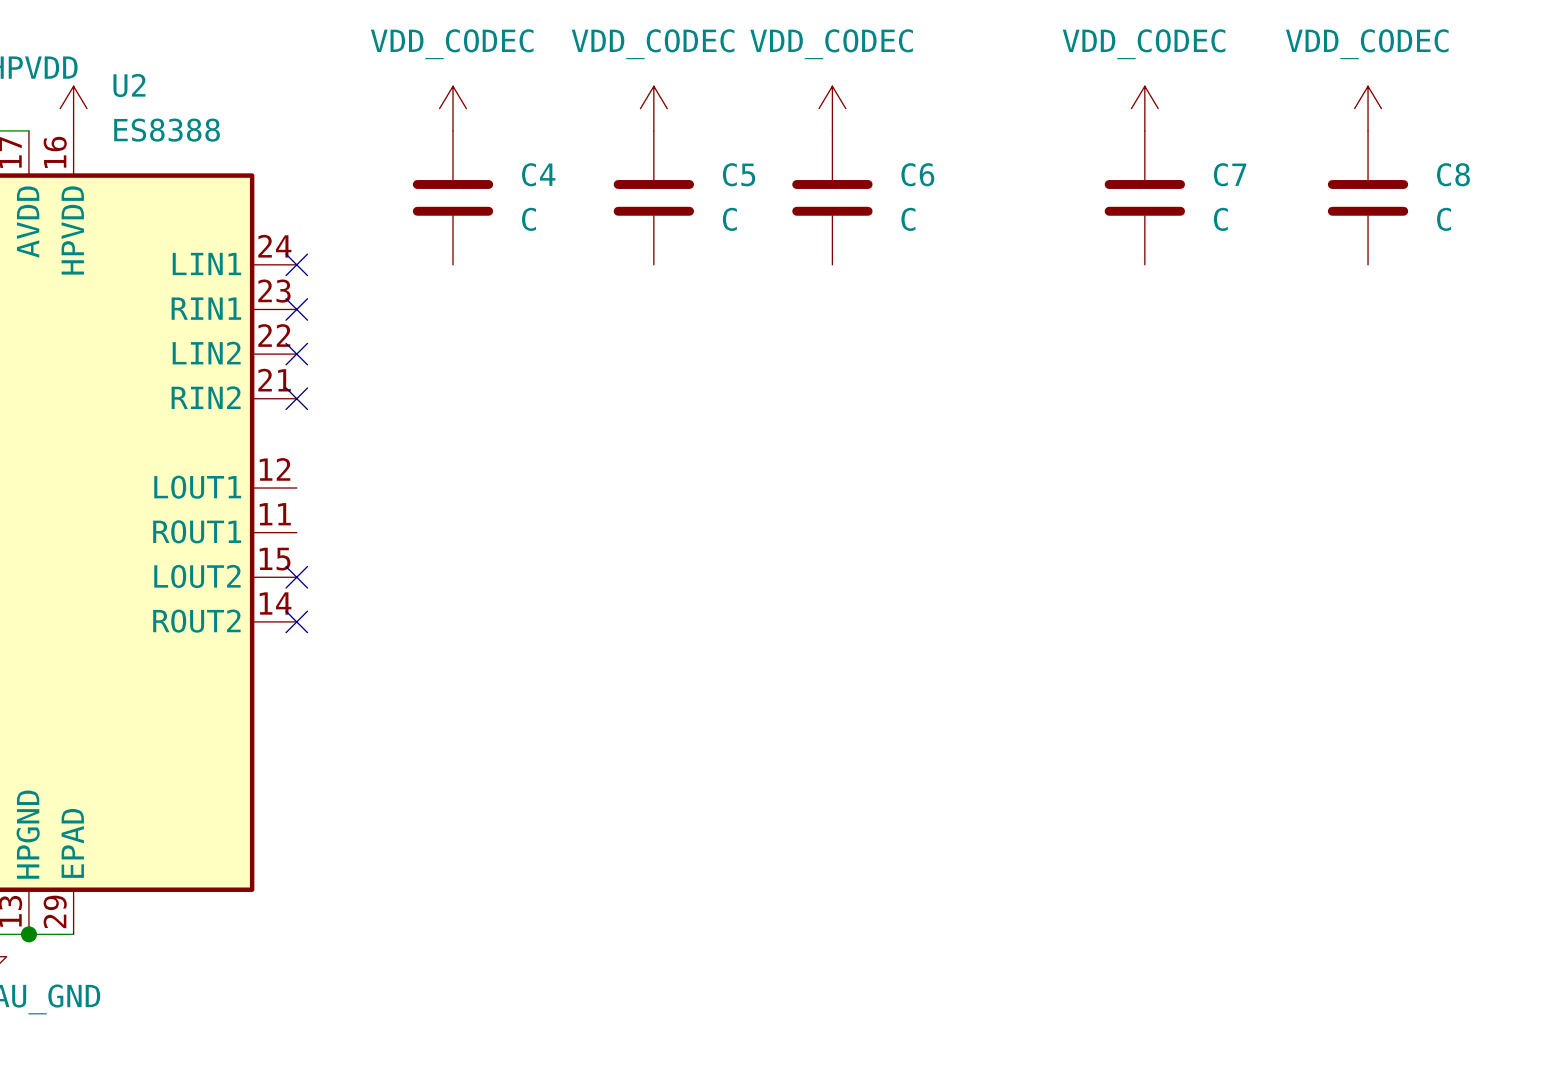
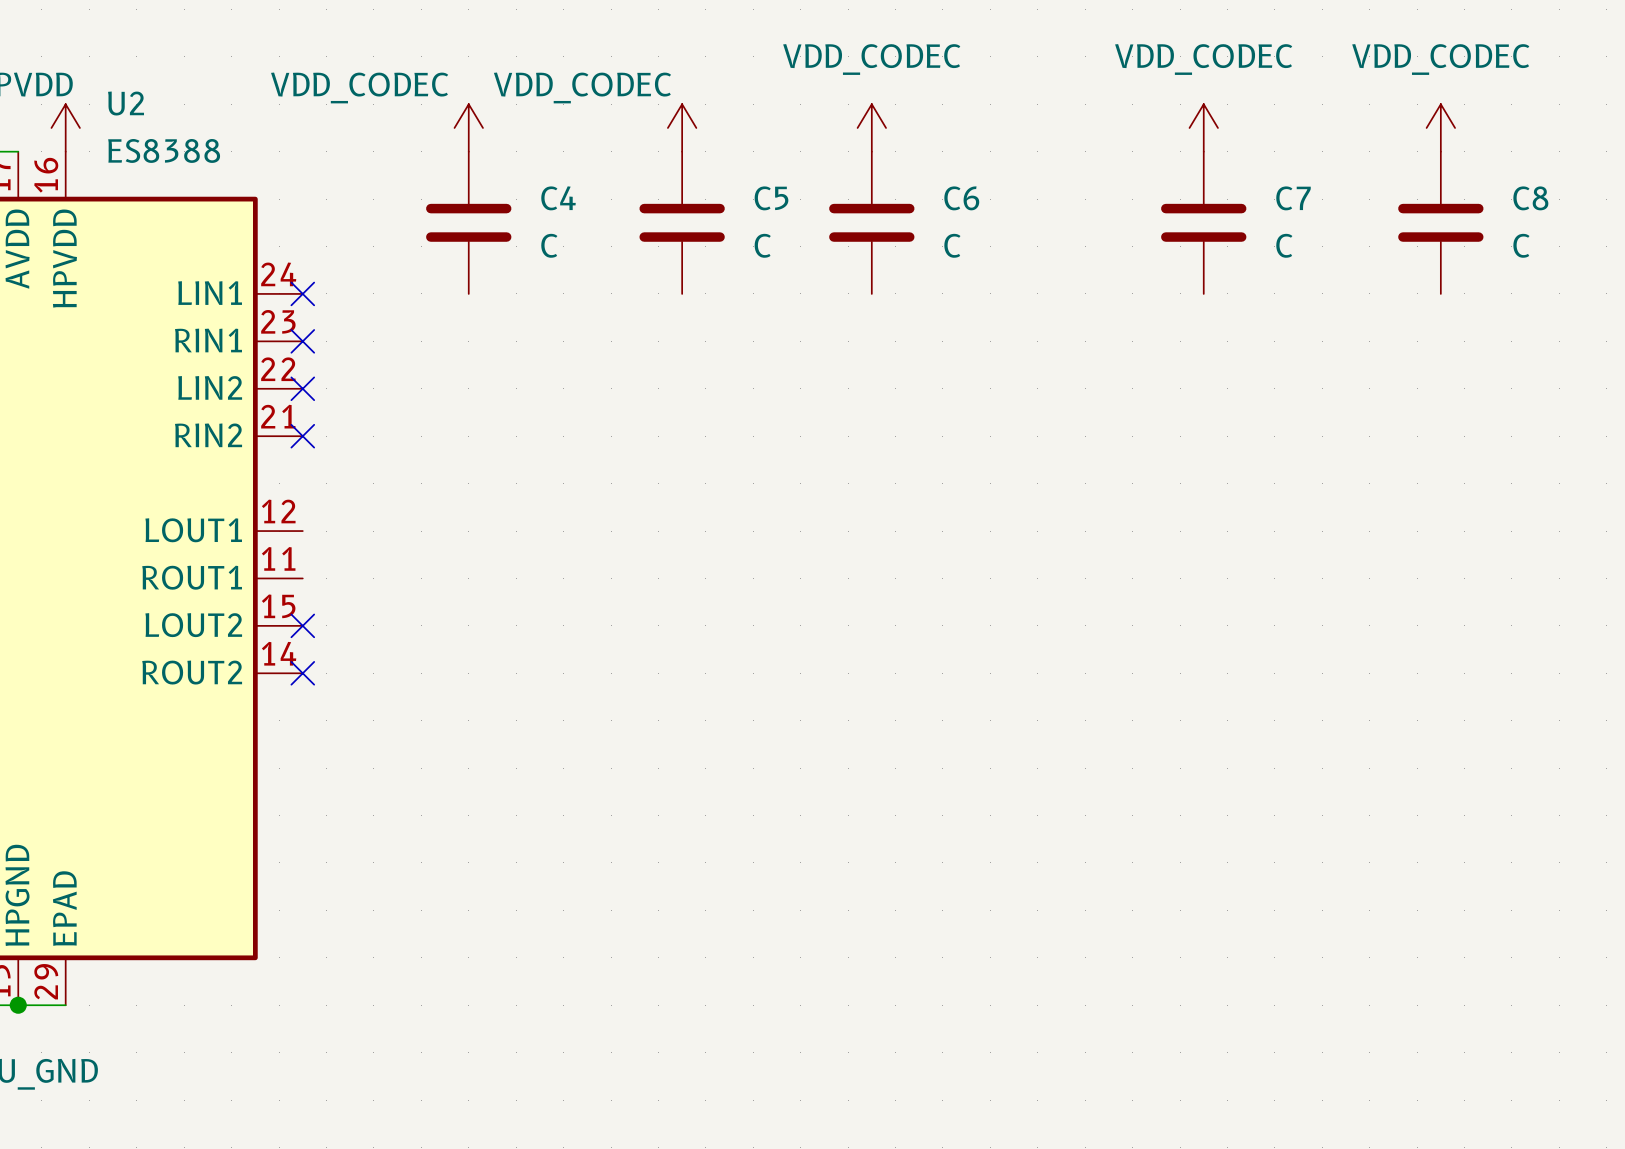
power symbol text position: VDD_CODEC (452, 44) -> VDD_CODEC (359, 87)
power symbol text position: VDD_CODEC (653, 44) -> VDD_CODEC (582, 87)

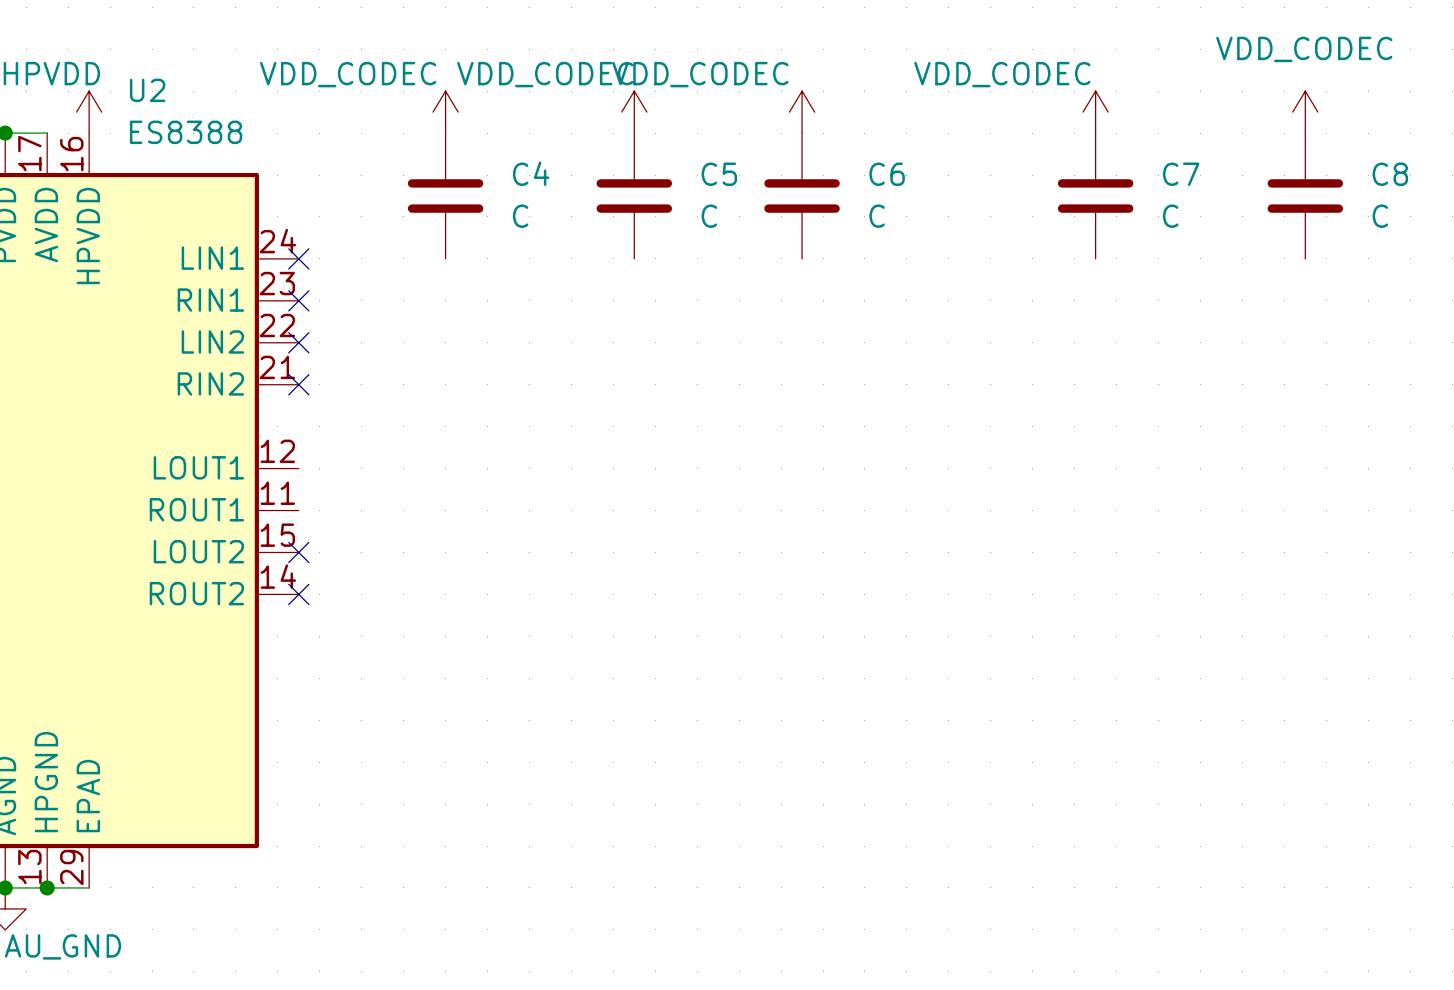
power symbol text position: VDD_CODEC (871, 59) -> VDD_CODEC (700, 74)
power symbol text position: VDD_CODEC (1203, 59) -> VDD_CODEC (1002, 74)

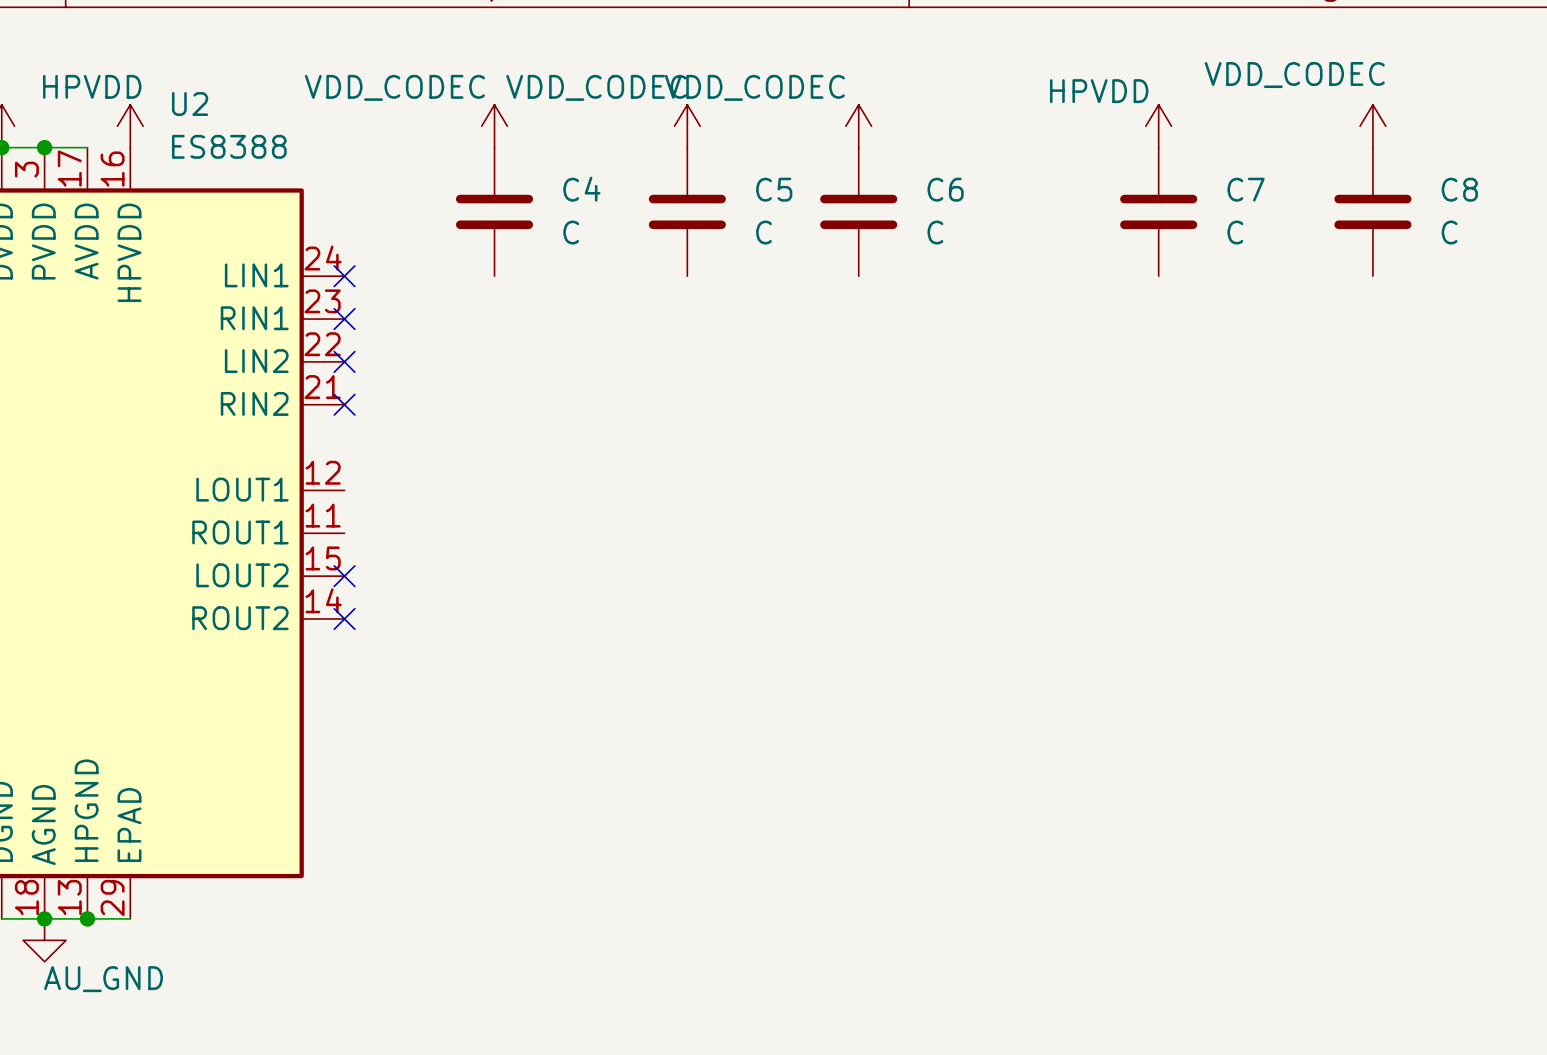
power symbol text position: VDD_CODEC (1304, 49) -> VDD_CODEC (1294, 75)
power symbol: VDD_CODEC (1095, 112) -> HPVDD (1158, 126)

